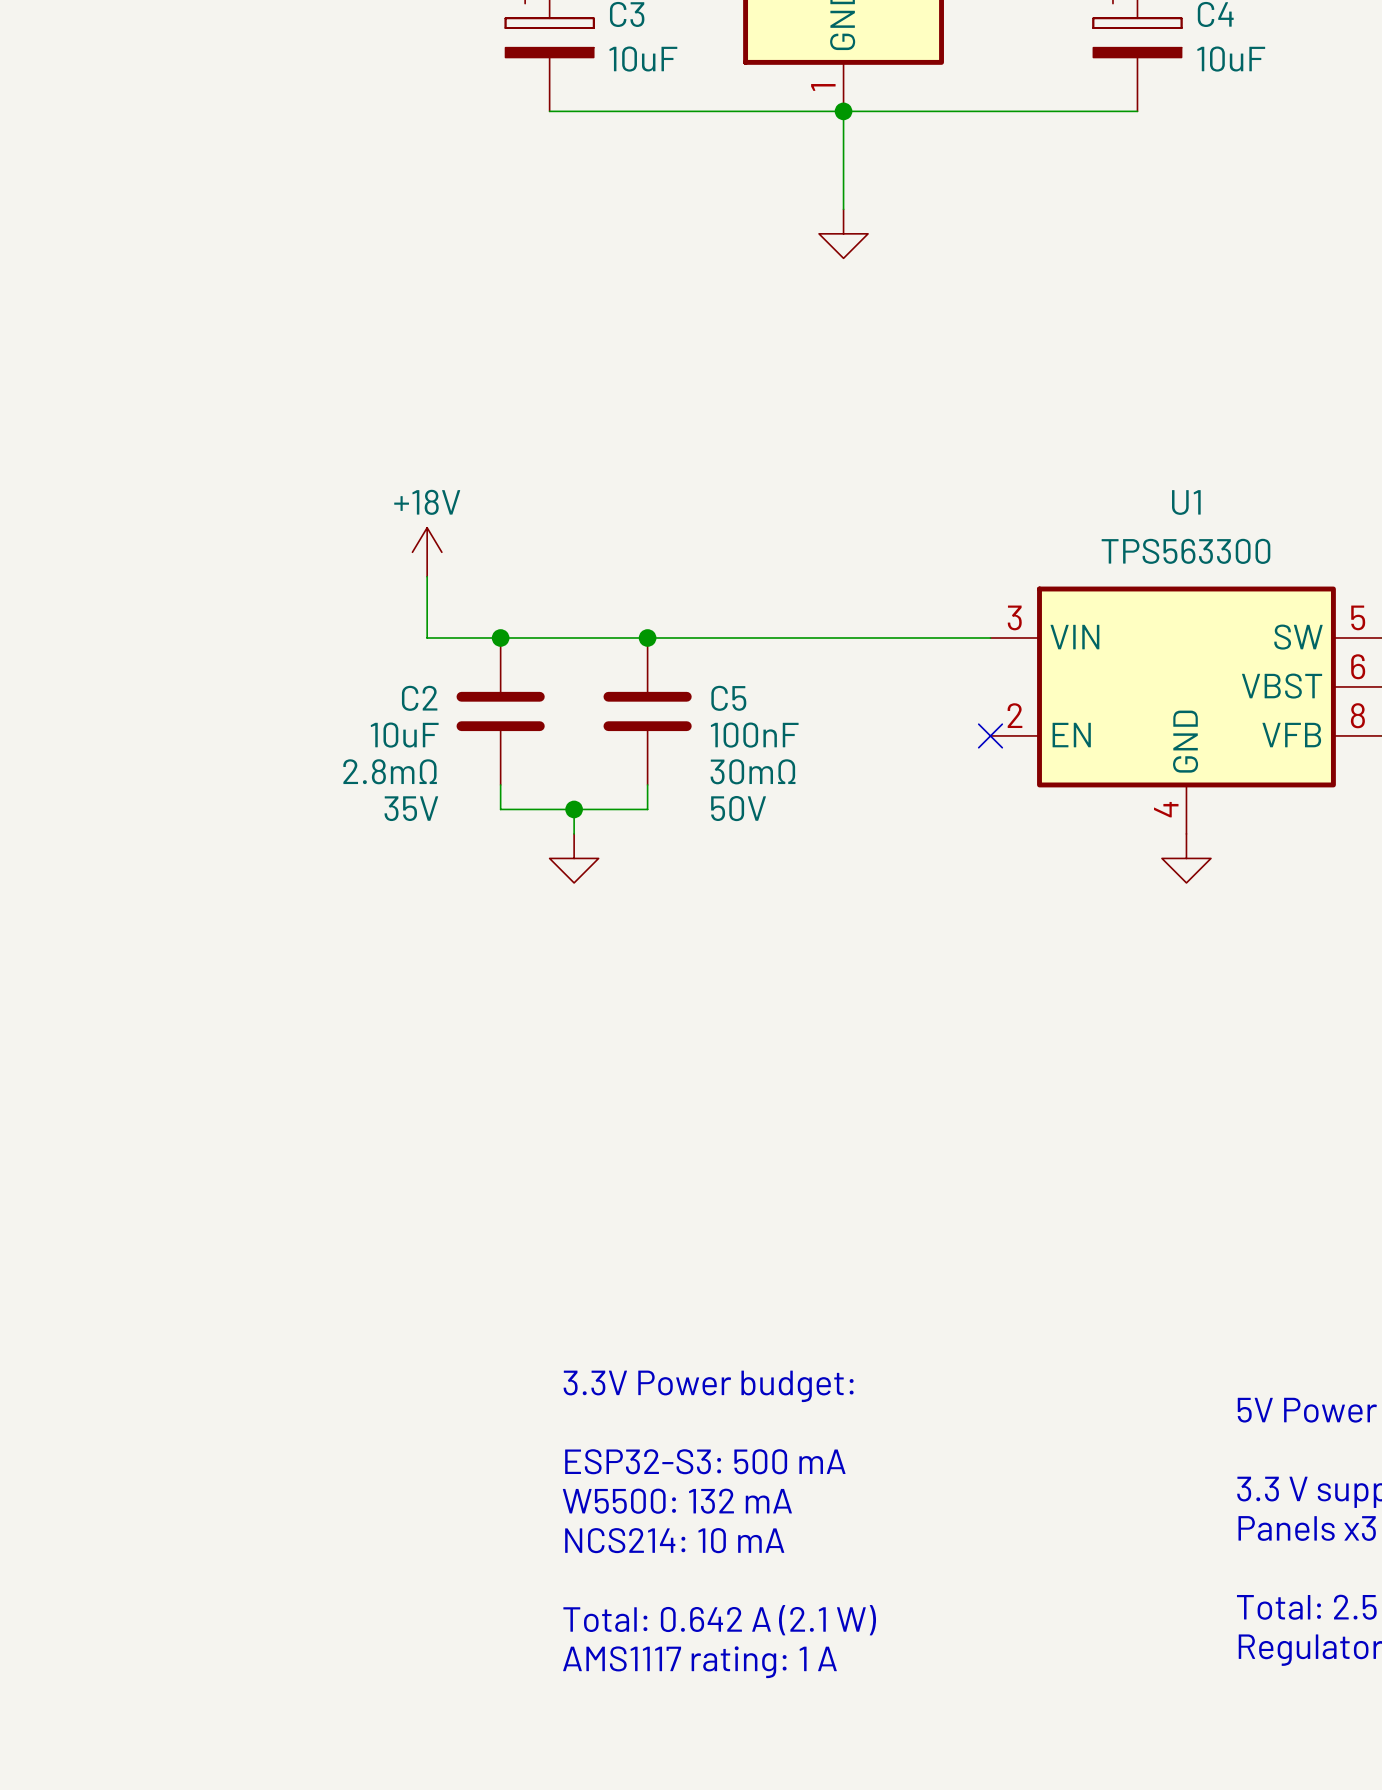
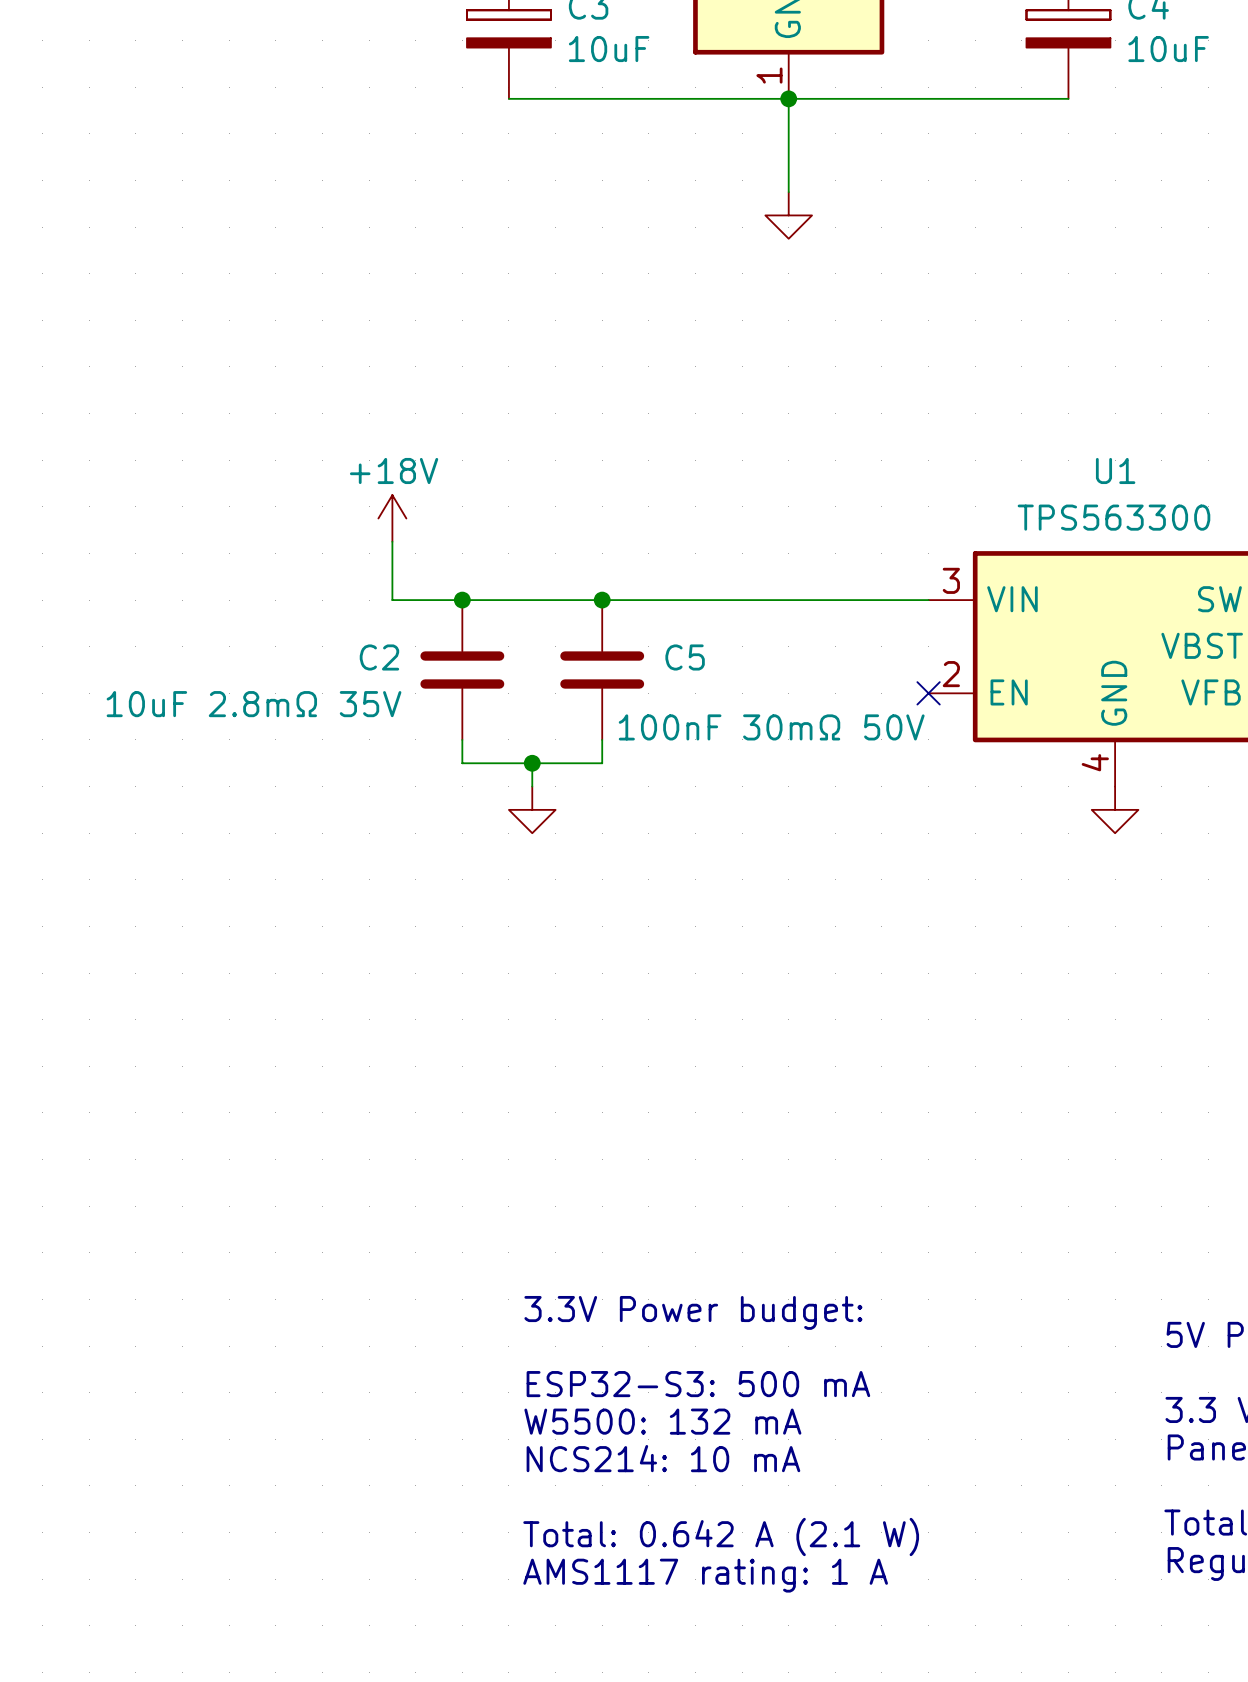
C2 value: 10uF (404, 735) -> 10uF 2.8mΩ 35V (254, 704)
C5 value: 100nF (754, 735) -> 100nF 30mΩ 50V (771, 727)
C2 text: 2.8mΩ (390, 771) -> none
C5 text: 30mΩ (753, 771) -> none
C2 text: 35V (411, 808) -> none
C5 text: 50V (738, 808) -> none

